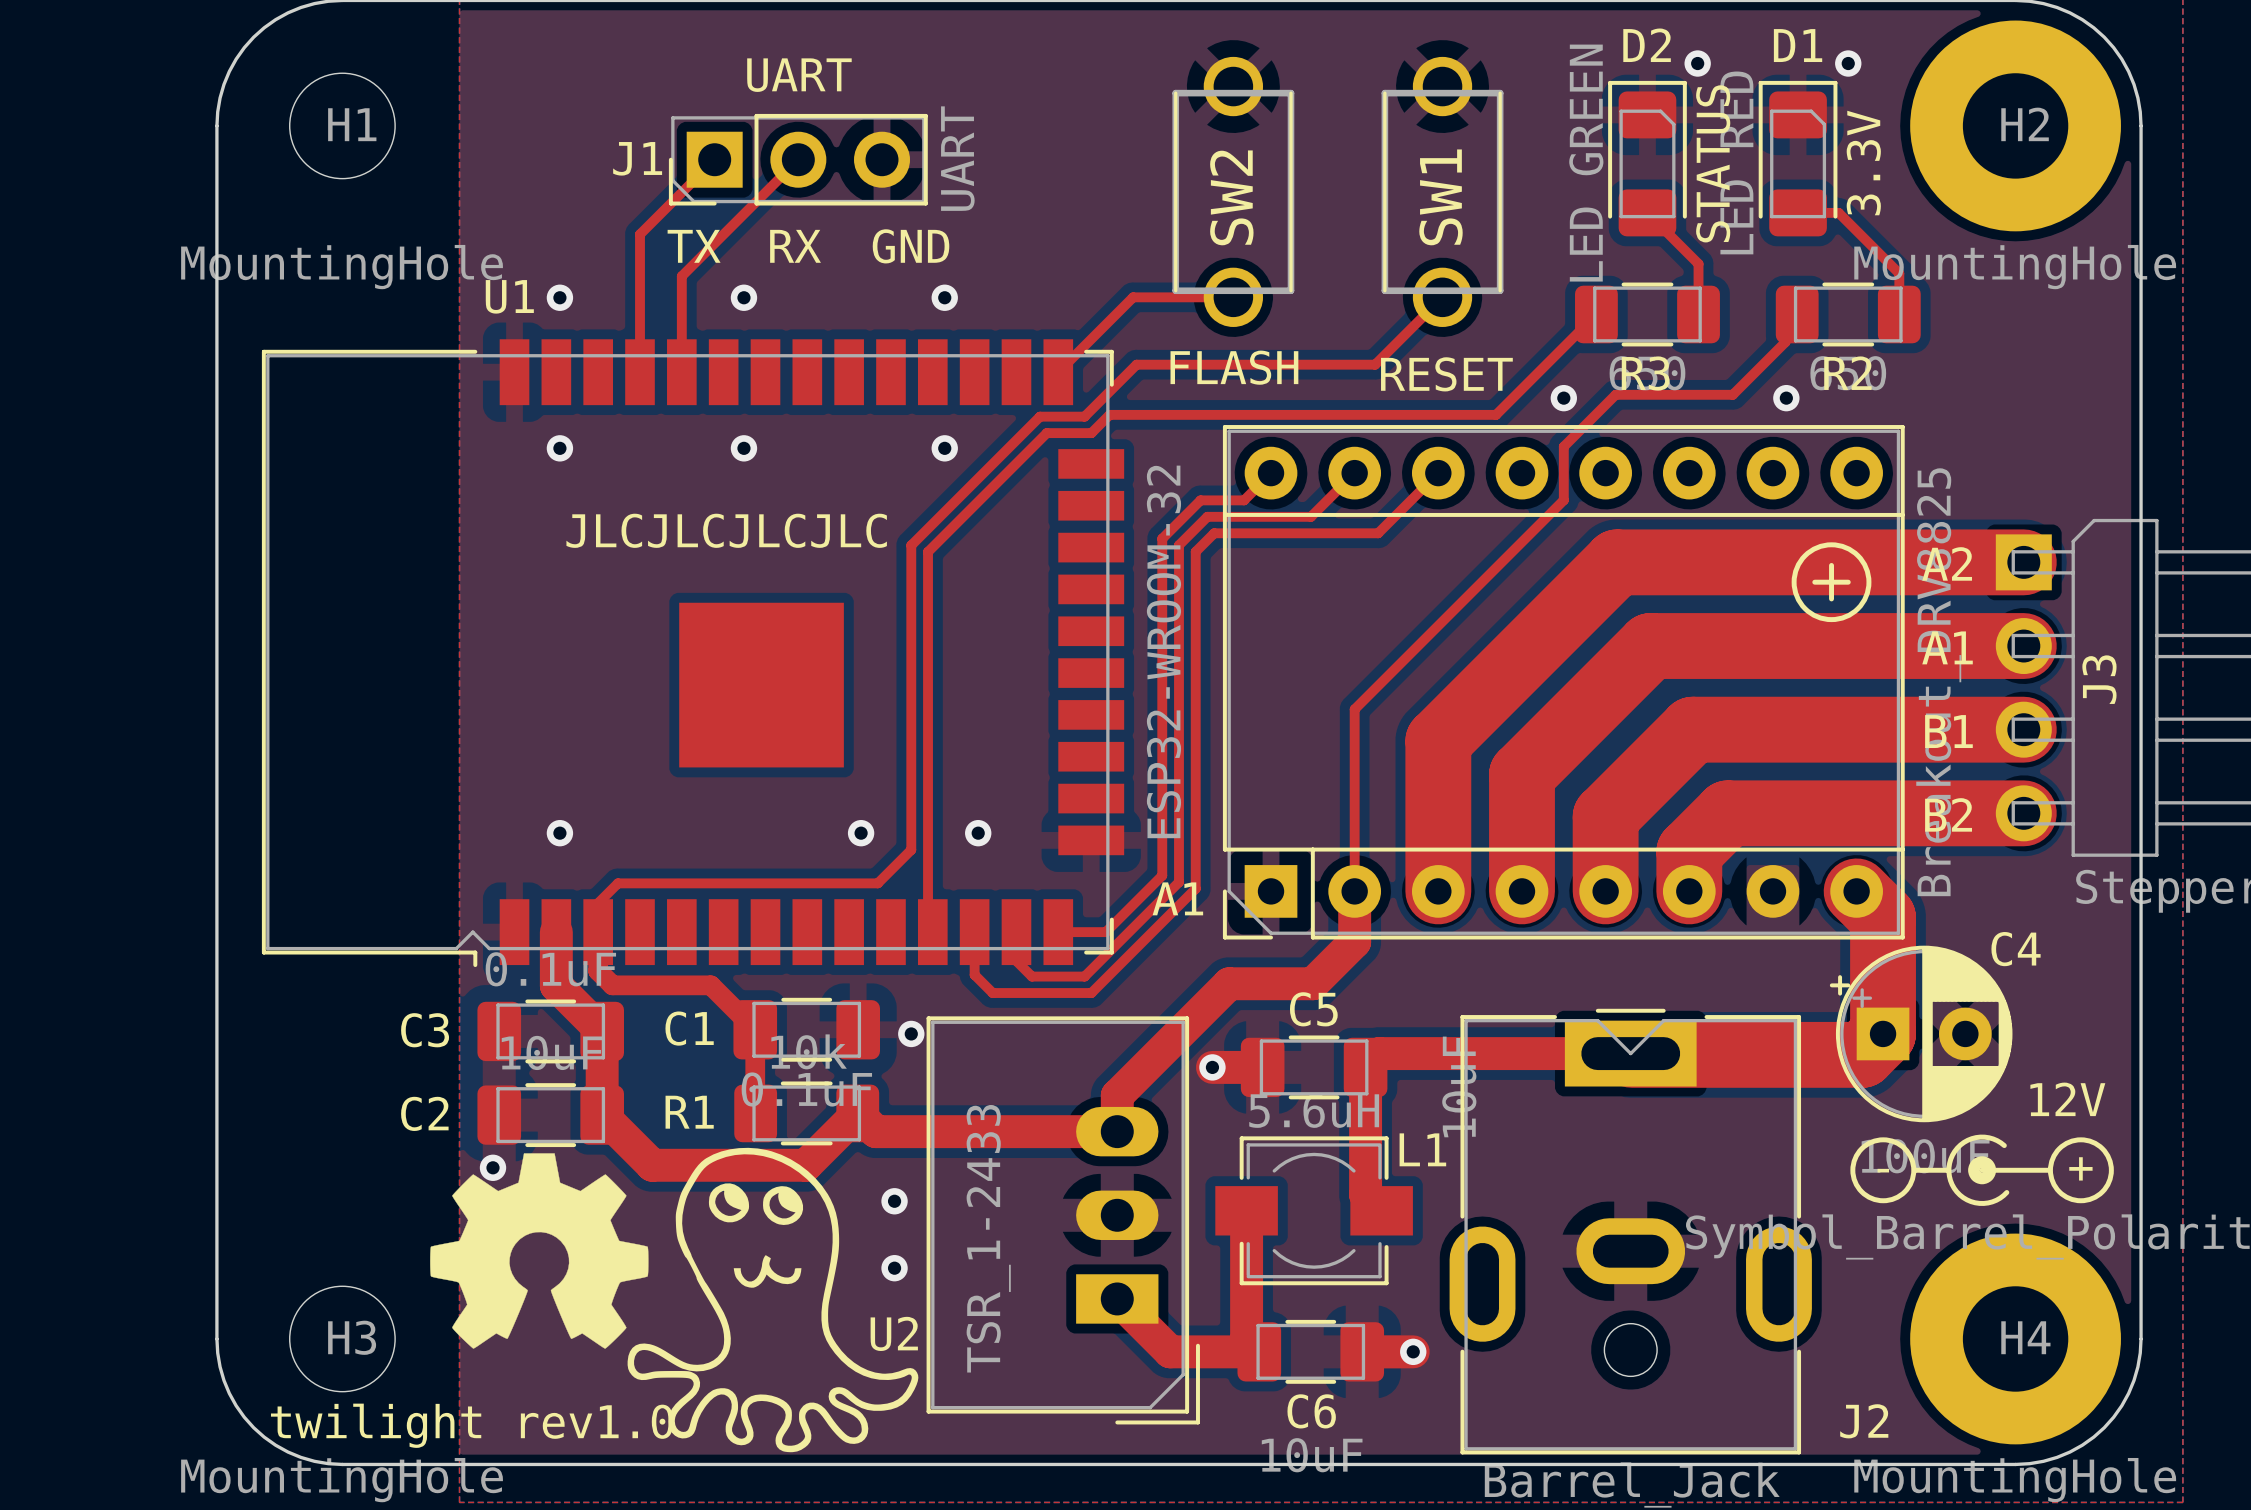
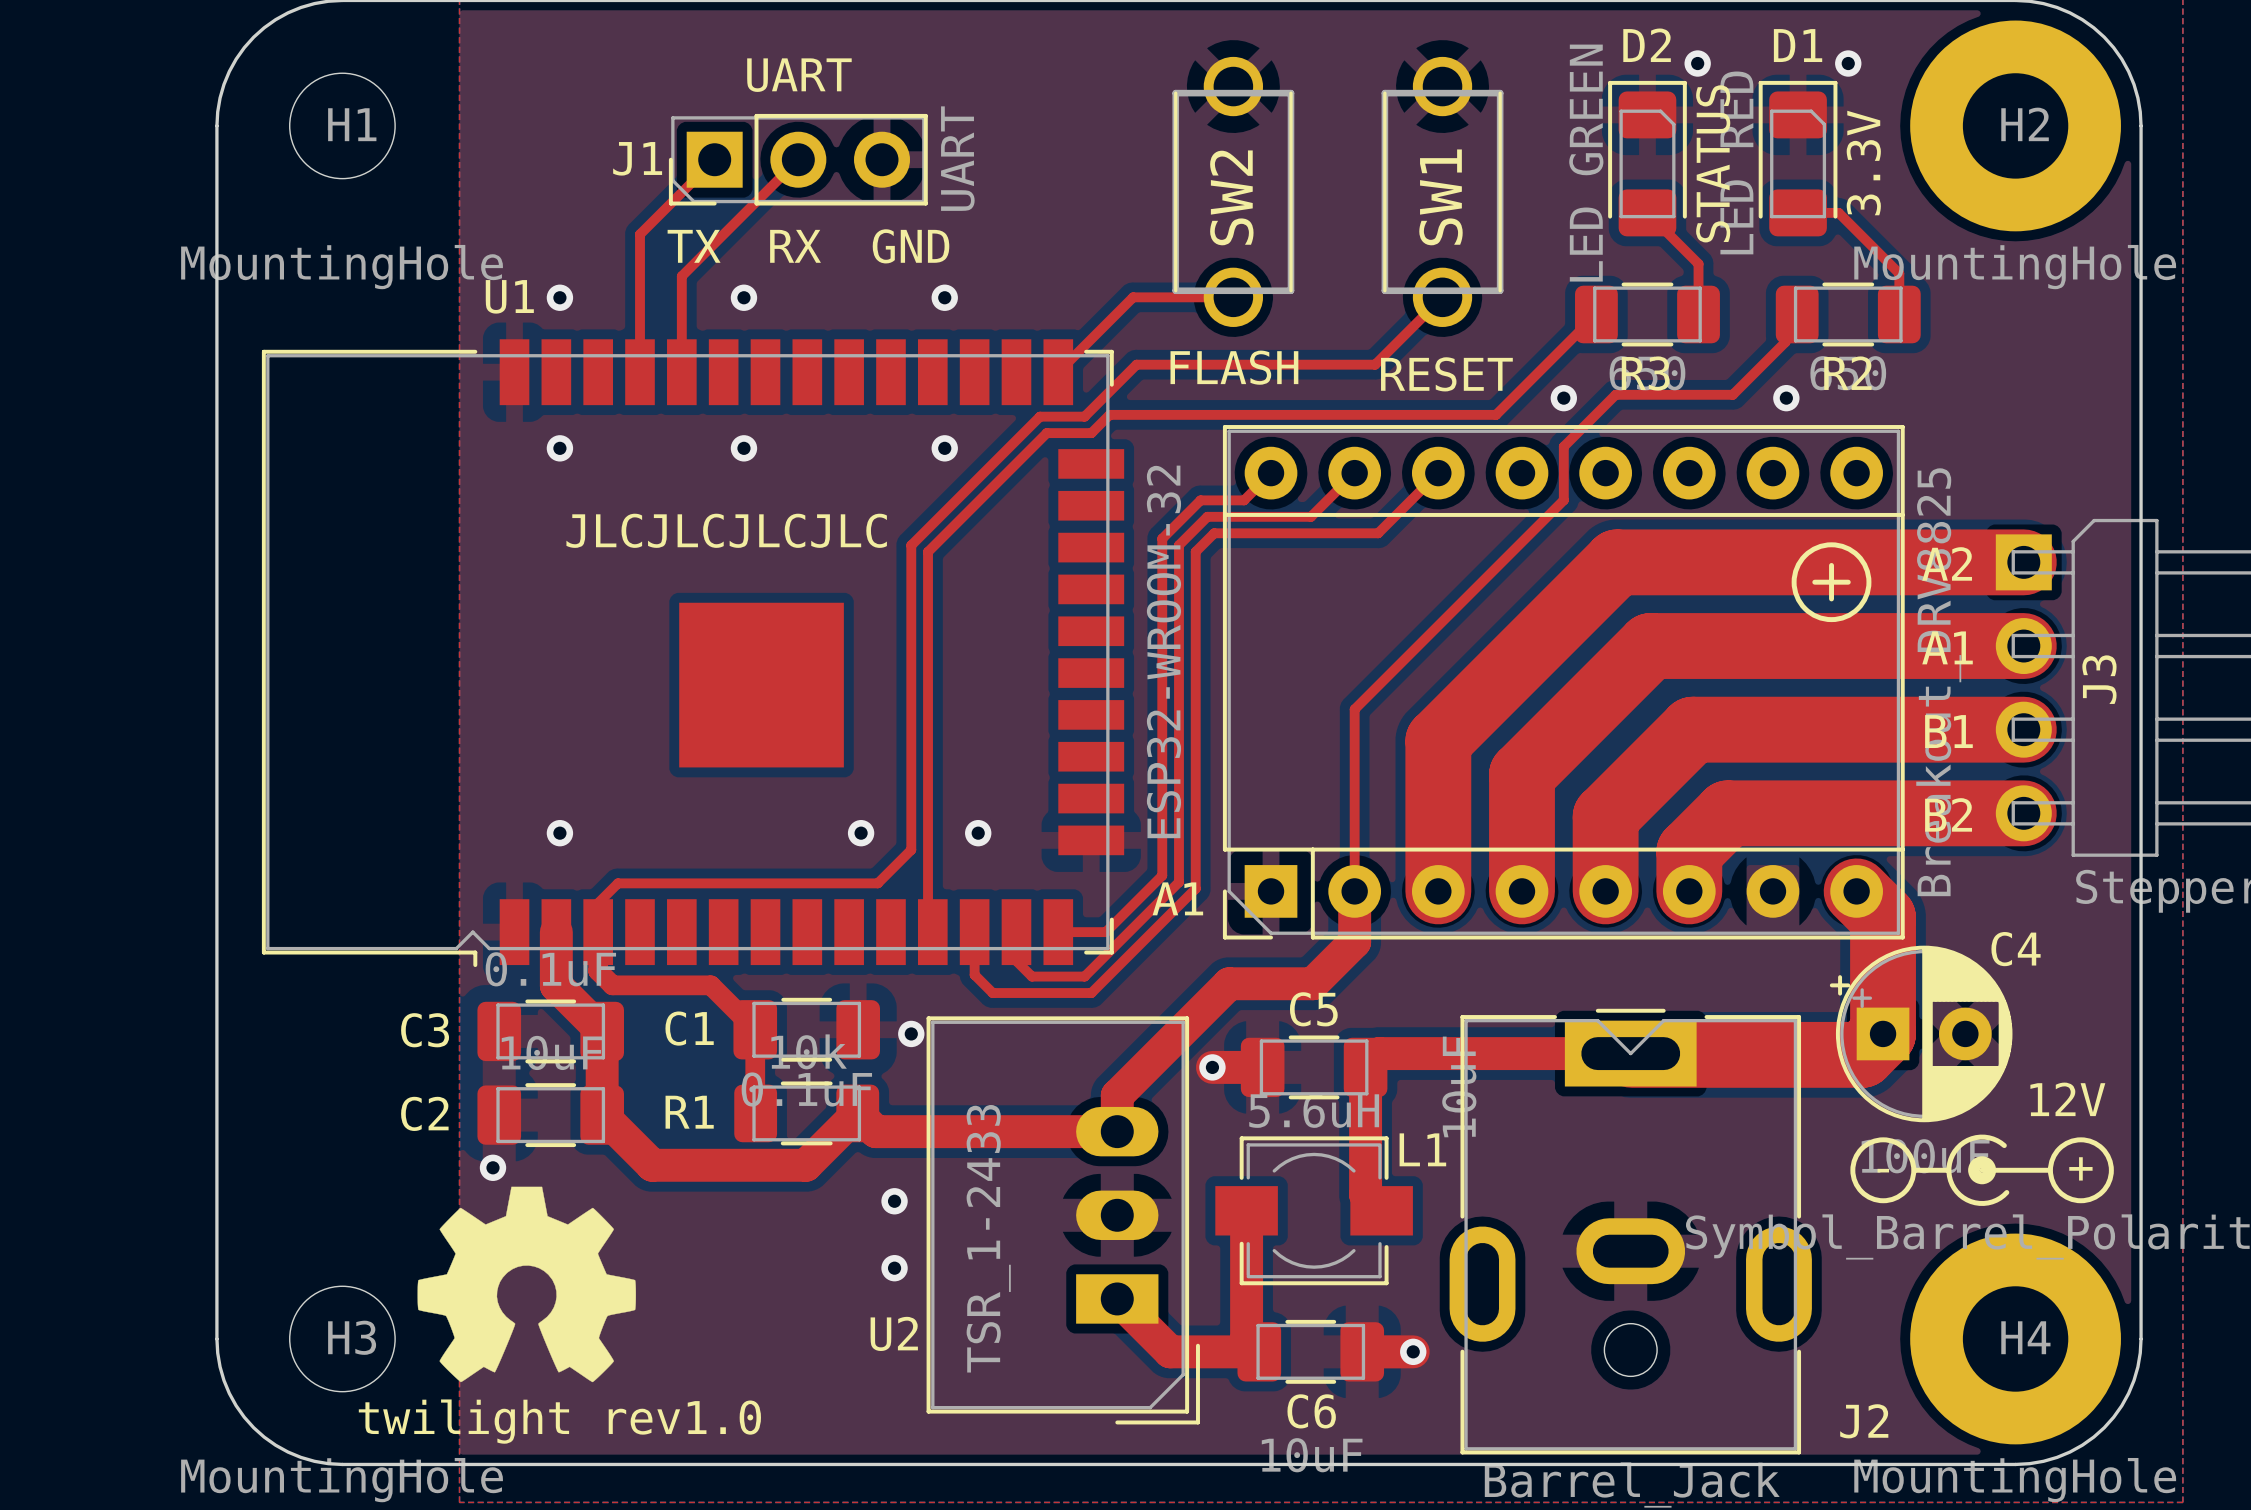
drawing: [627, 1147, 919, 1453] -> none
drawing position: (539, 1251) -> (526, 1284)
text position: twilight rev1.0 (472, 1425) -> twilight rev1.0 (559, 1421)

